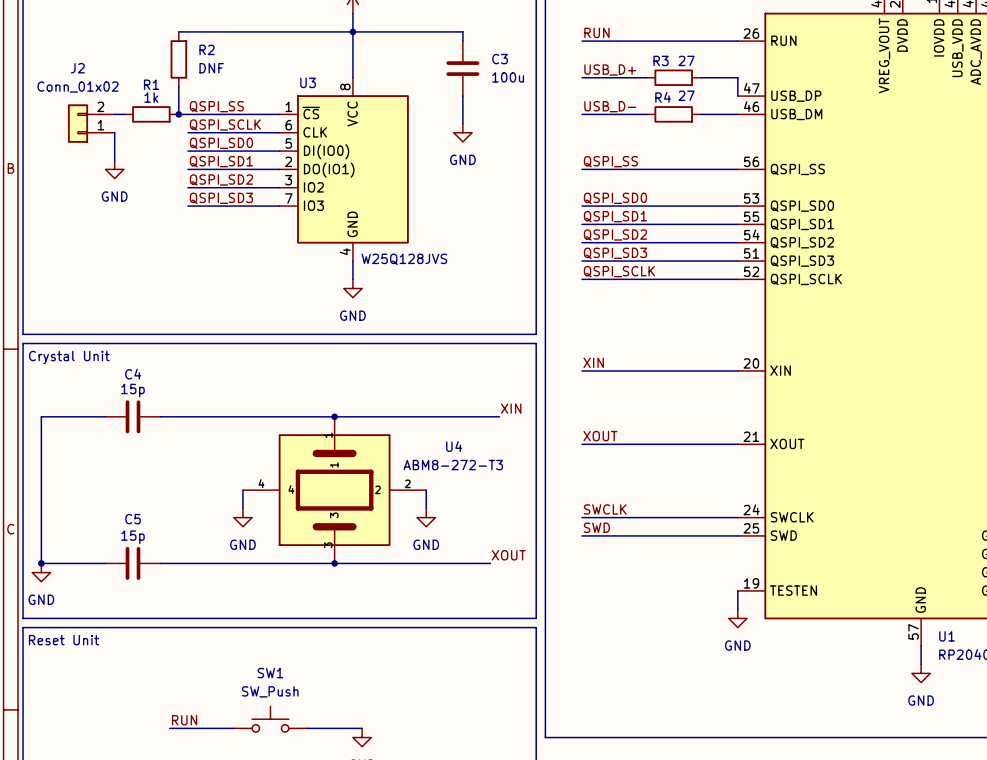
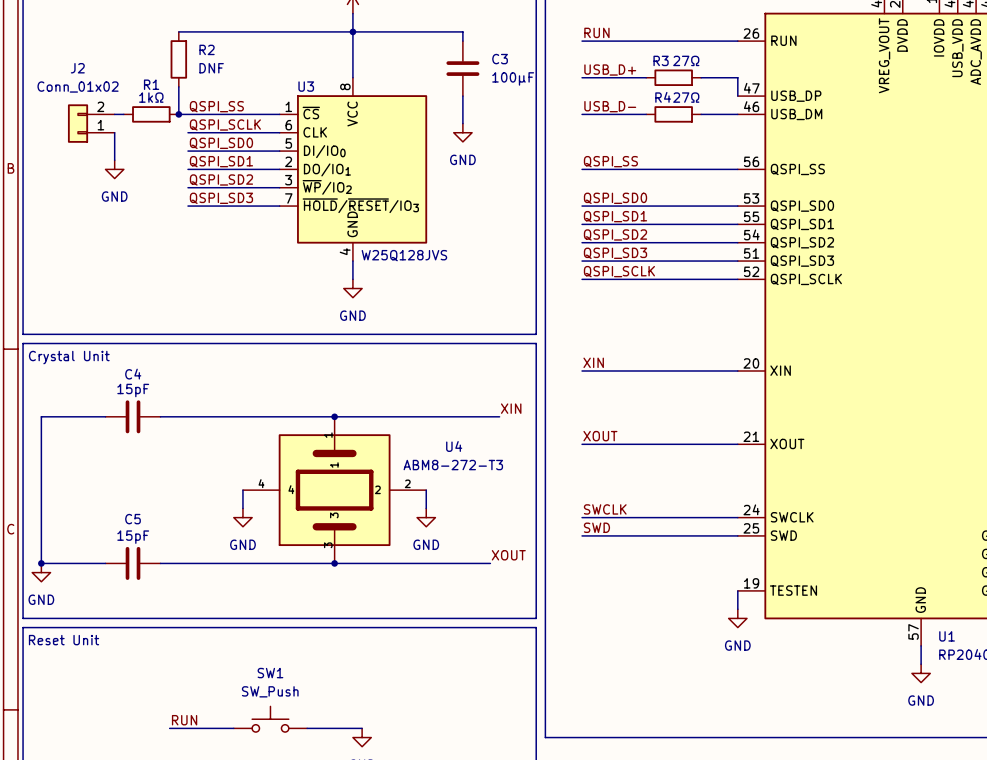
R3 value: 27 (686, 60) -> 27Ω (686, 60)
U3 symbol: [279, 77, 409, 262] -> [279, 77, 428, 262]
C3 value: 100u (508, 77) -> 100μF (513, 78)
R4 value: 27 (686, 95) -> 27Ω (686, 97)
R1 value: 1k (151, 97) -> 1kΩ (151, 97)
C4 value: 15p (133, 390) -> 15pF (133, 390)
C5 value: 15p (133, 537) -> 15pF (133, 537)

